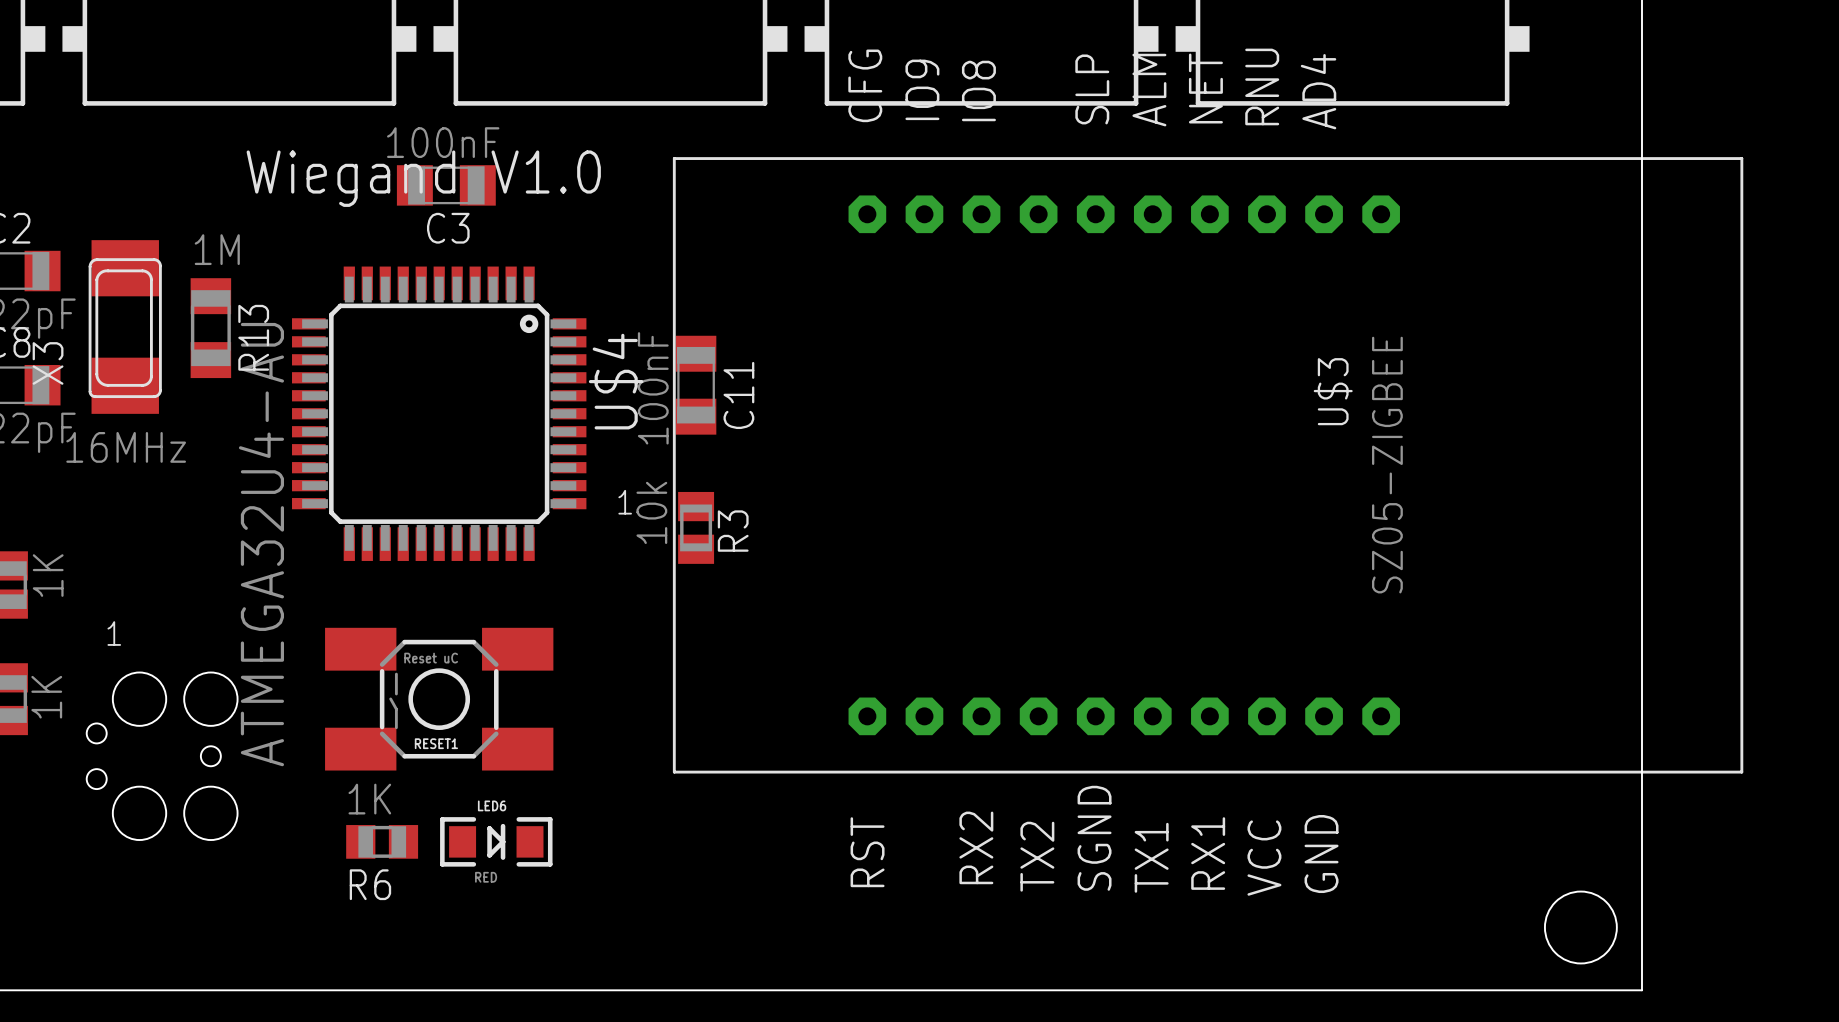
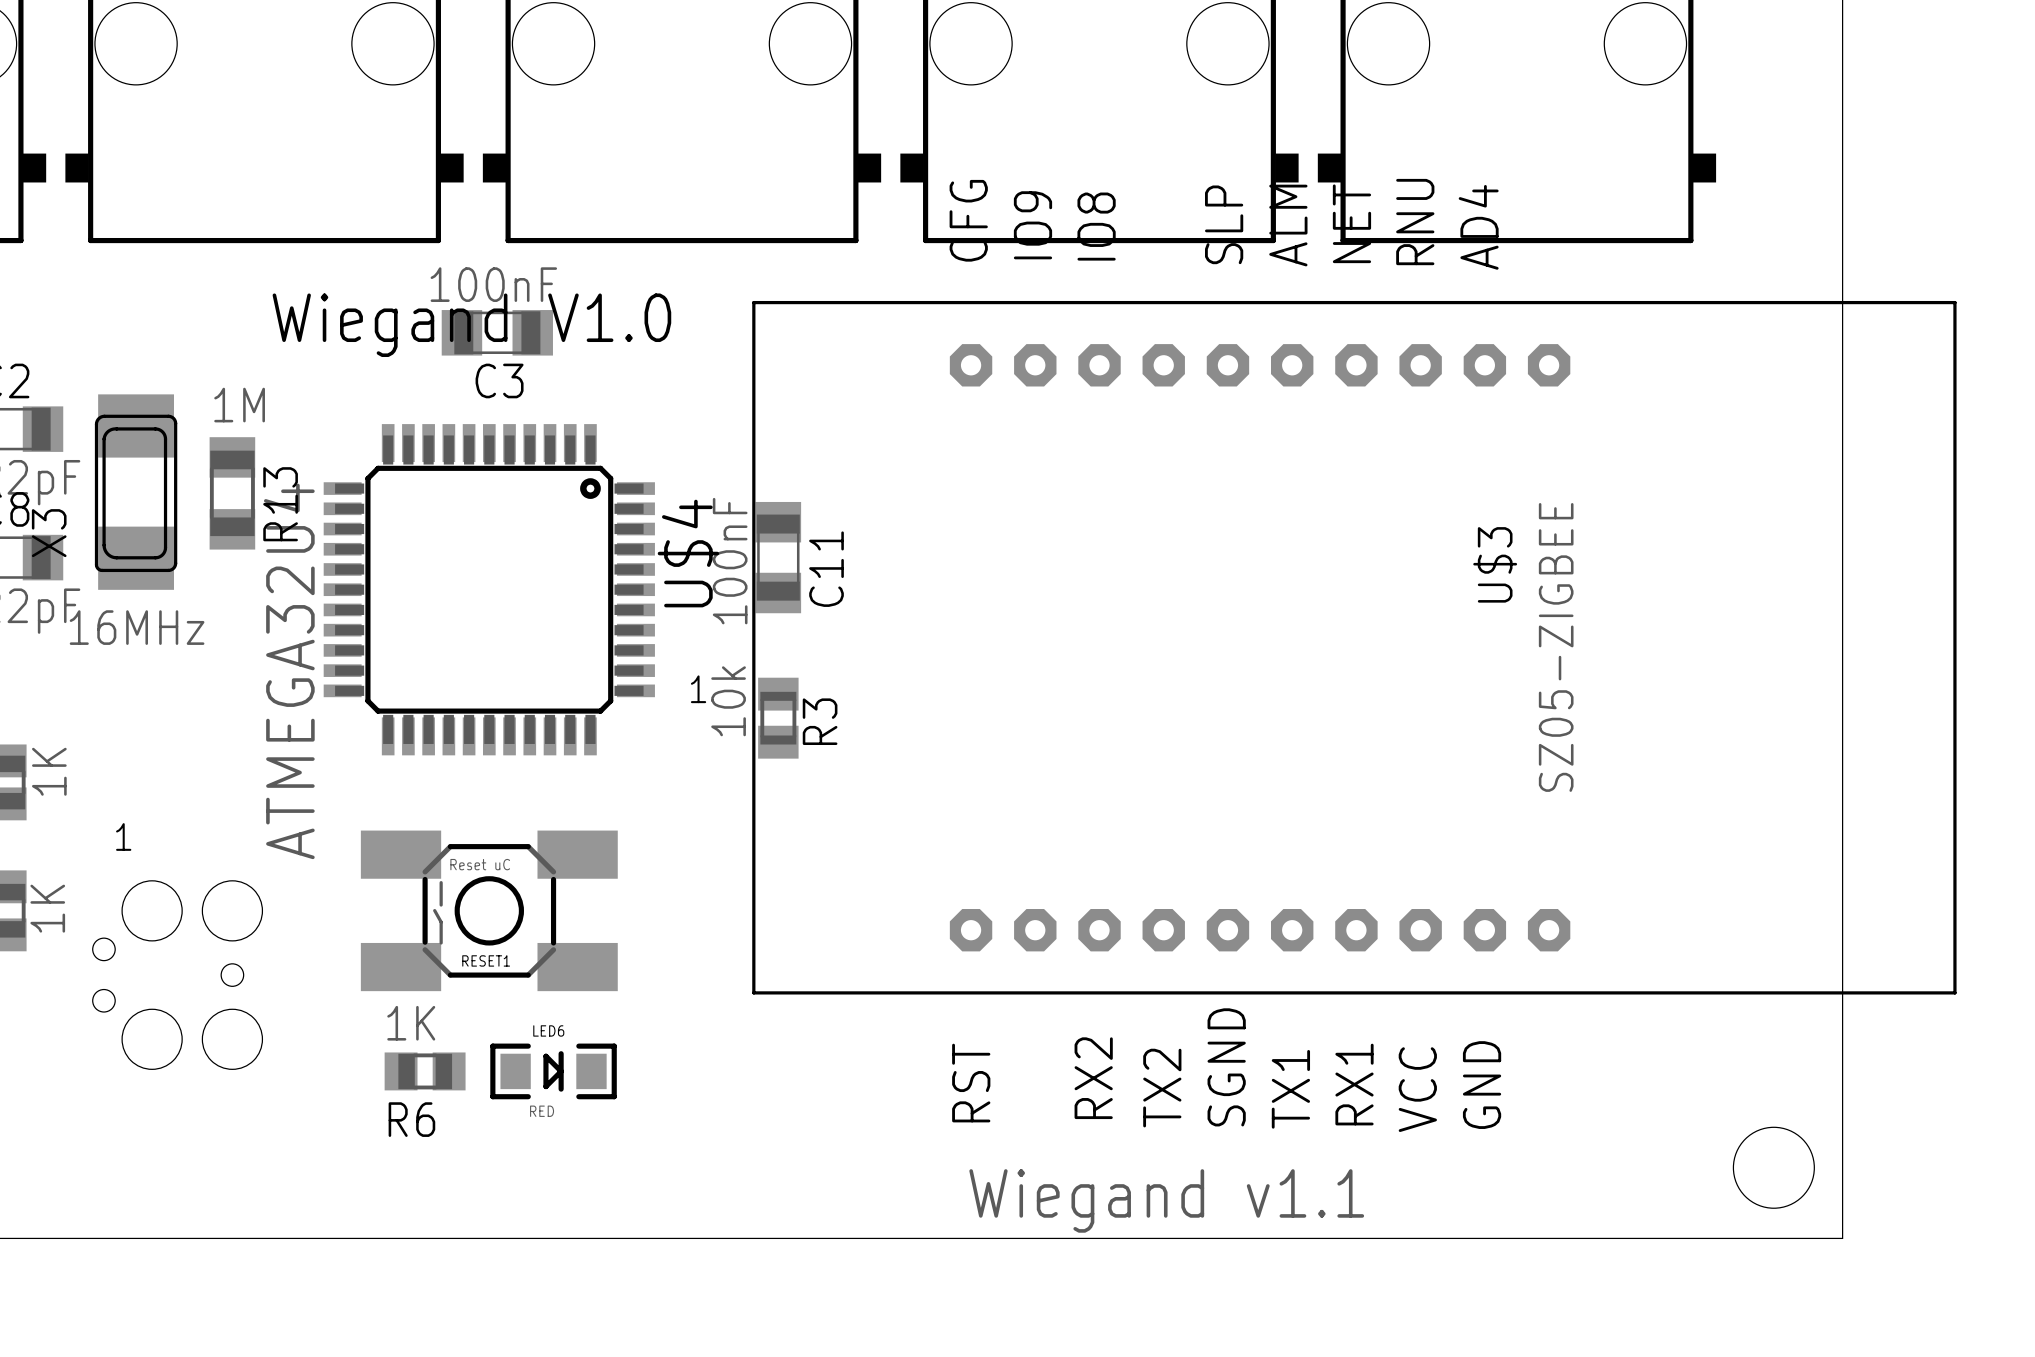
U$4 value: ATMEGA32U4-AU (261, 544) -> ATMEGA32U4 (289, 671)
text: none -> Wiegand v1.1 (1166, 1200)

